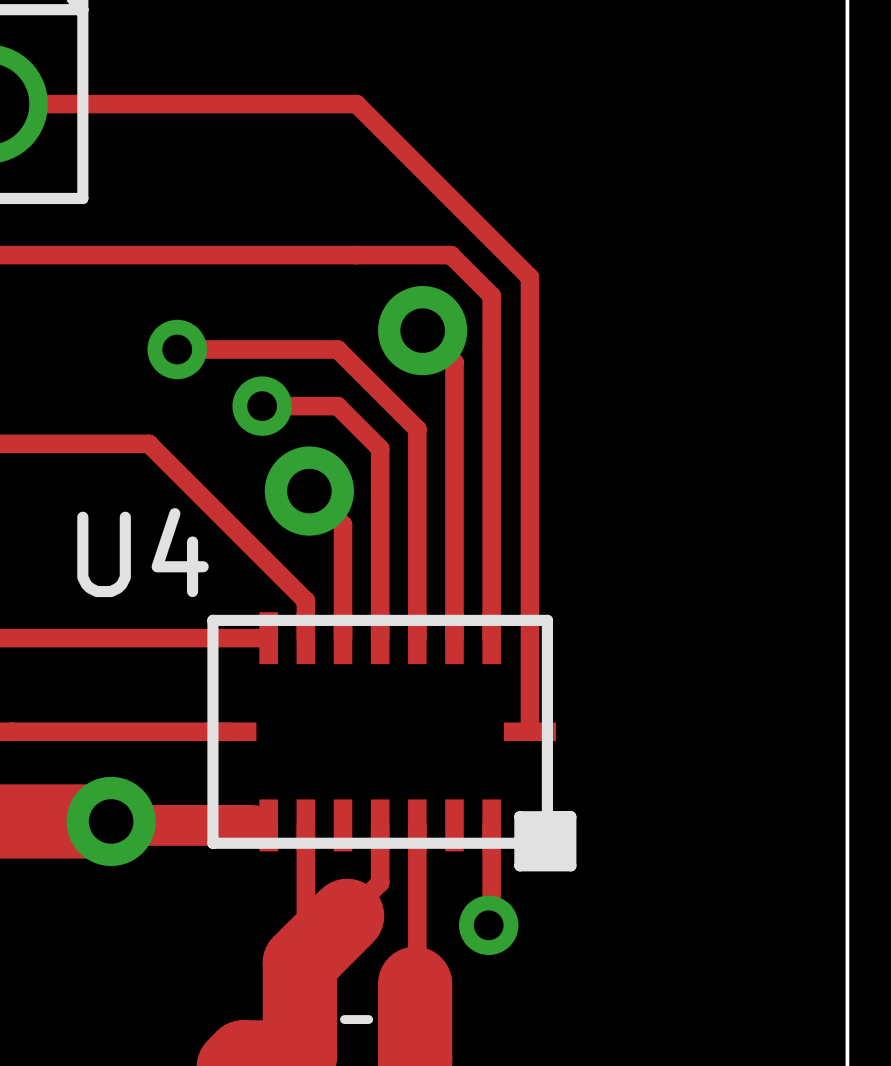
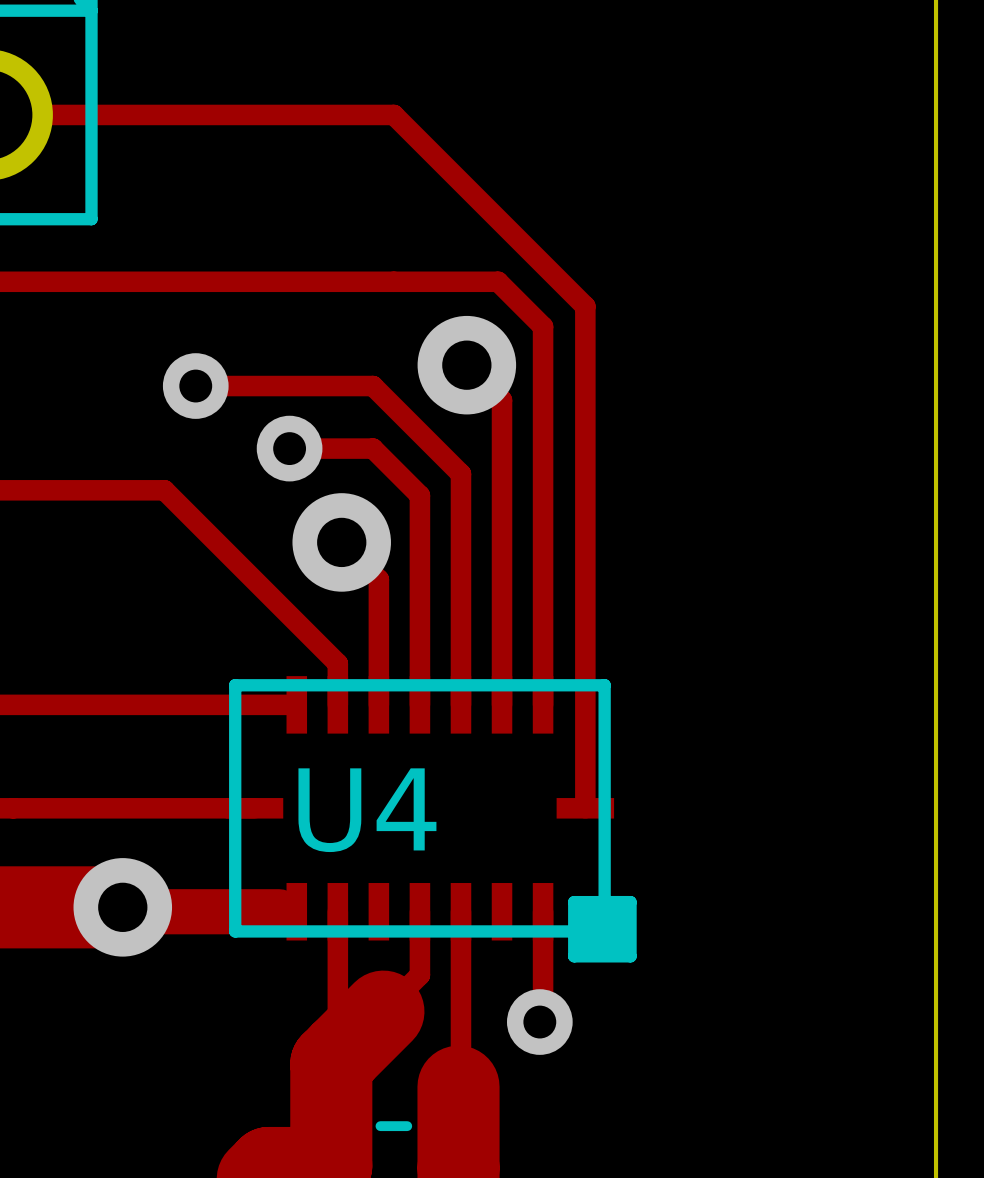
U4 name position: U4 (143, 552) -> U4 (367, 810)

